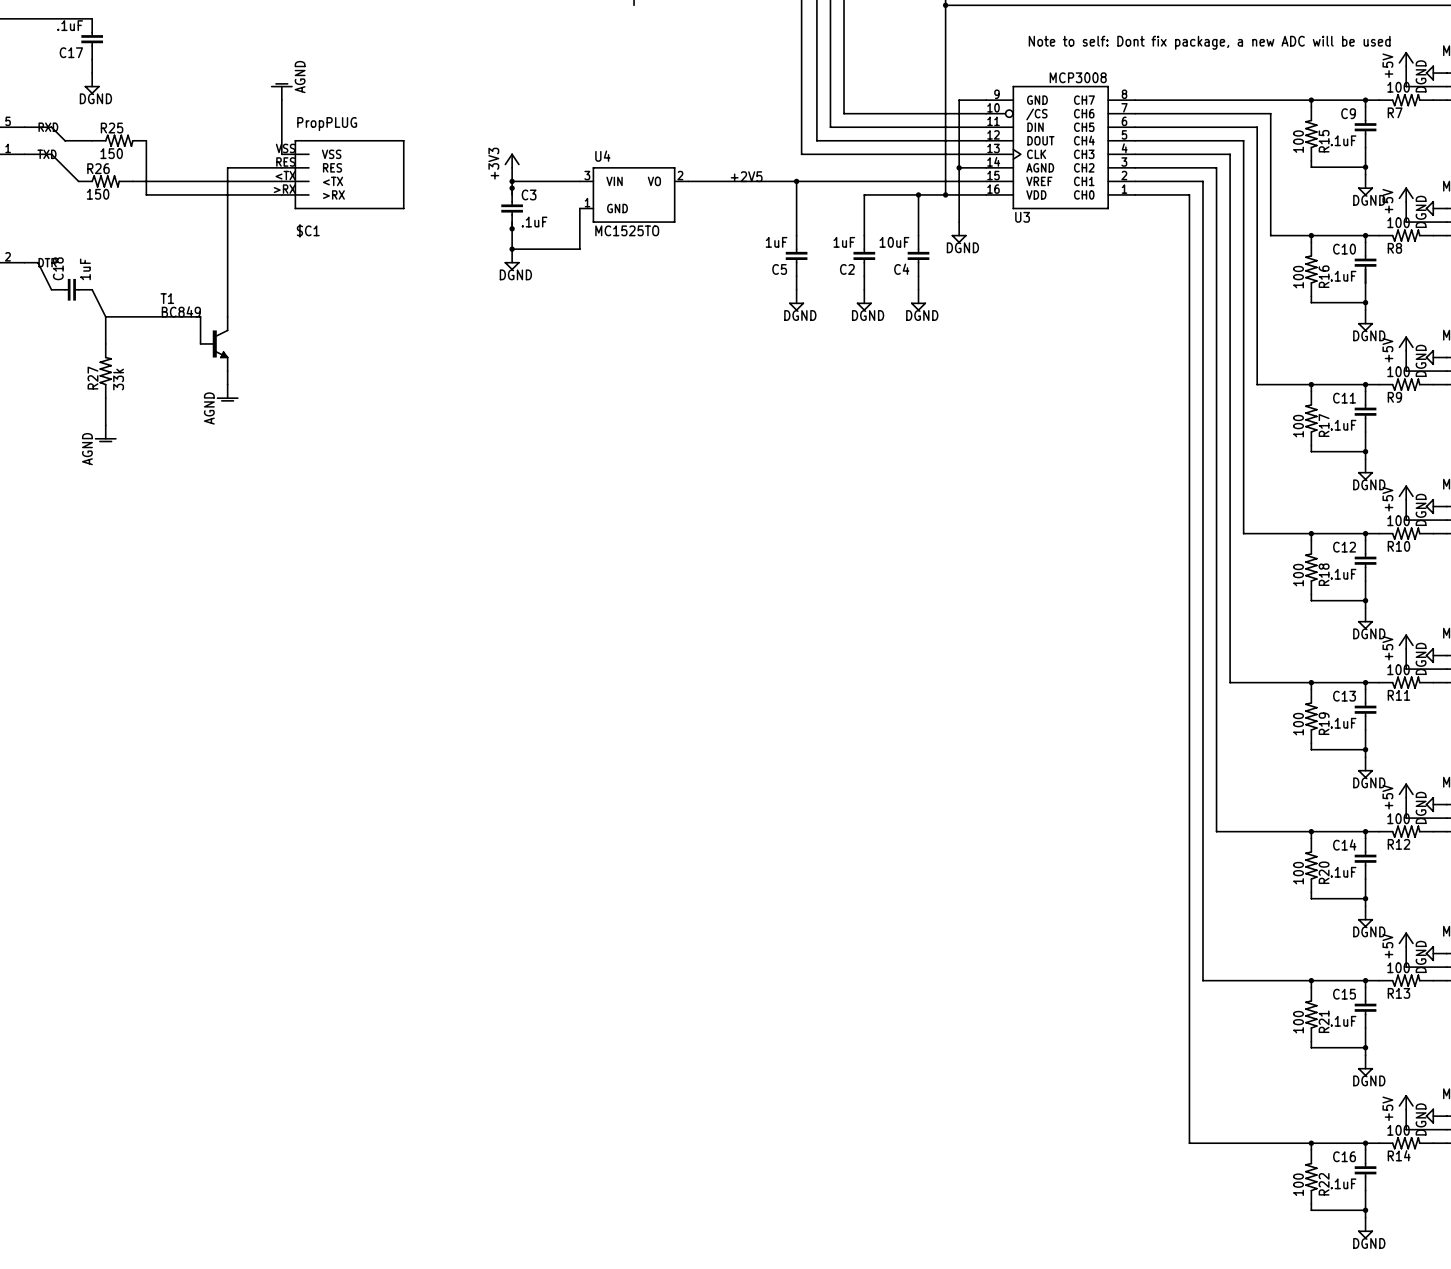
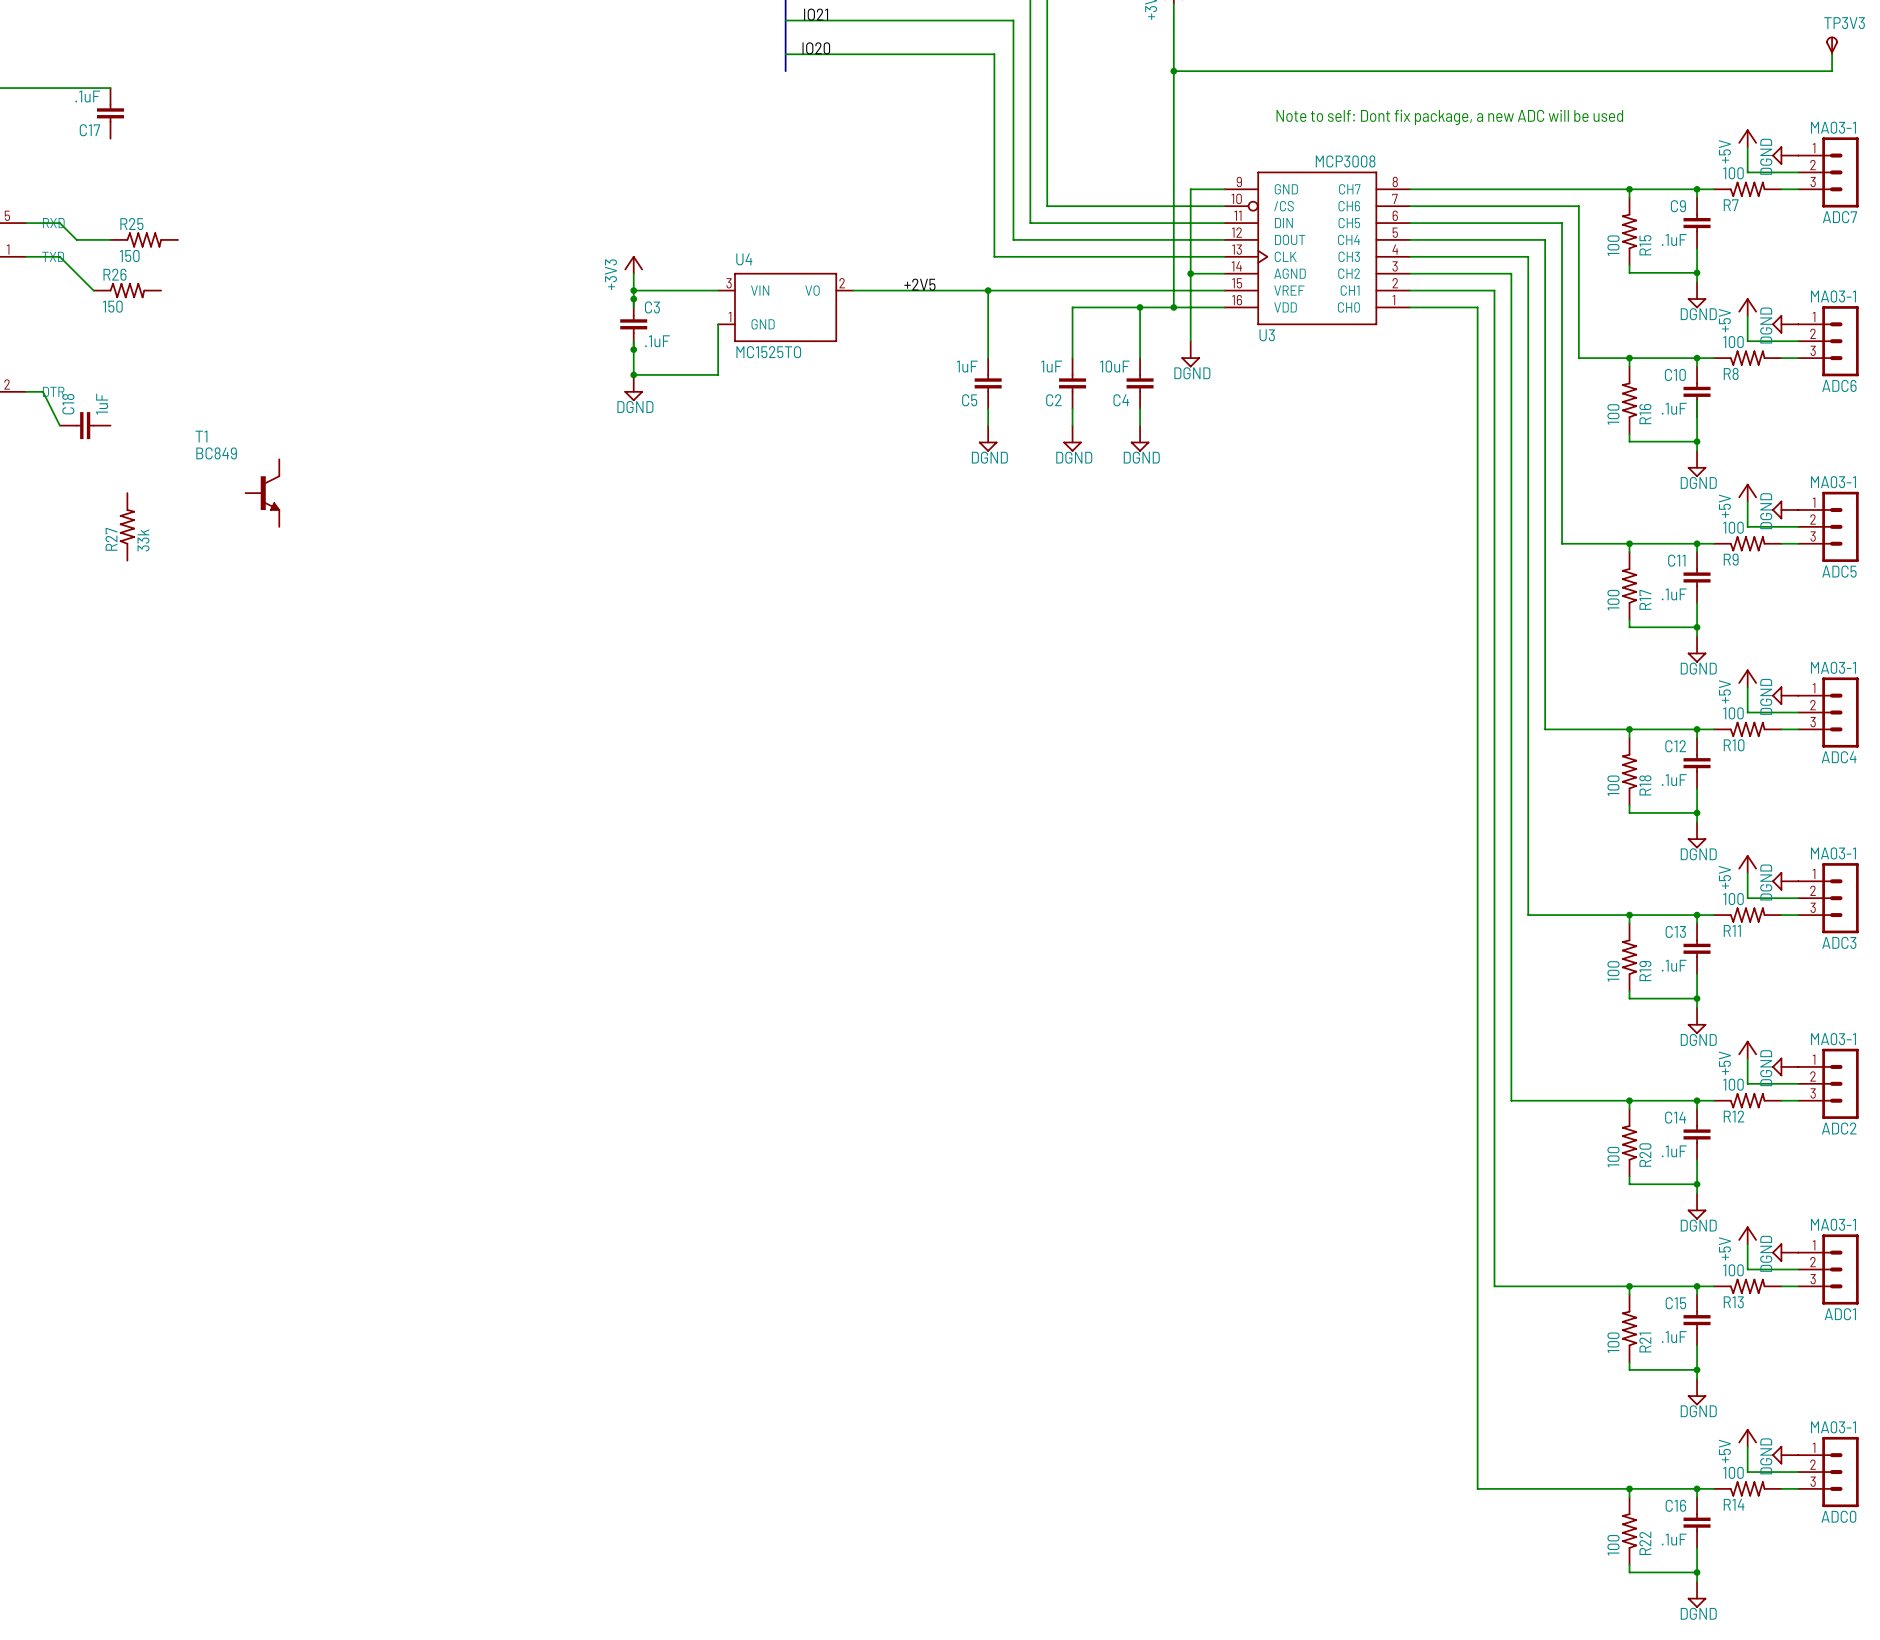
wire: (92, 59) (92, 73) -> none
power symbol: DGND (92, 83) -> none
power symbol: AGND (281, 91) -> none
wire: (281, 100) (281, 154) -> none
wire: (146, 140) (146, 194) (281, 194) -> none
wire: (281, 167) (227, 167) (227, 316) -> none
part: (343, 174) -> none
wire: (132, 181) (281, 181) -> none
wire: (92, 289) (105, 316) -> none
wire: (105, 316) (105, 343) -> none
wire: (105, 316) (200, 316) (200, 343) -> none
wire: (227, 371) (227, 384) -> none
power symbol: AGND (227, 393) -> none
wire: (105, 398) (105, 425) -> none
power symbol: AGND (105, 433) -> none

